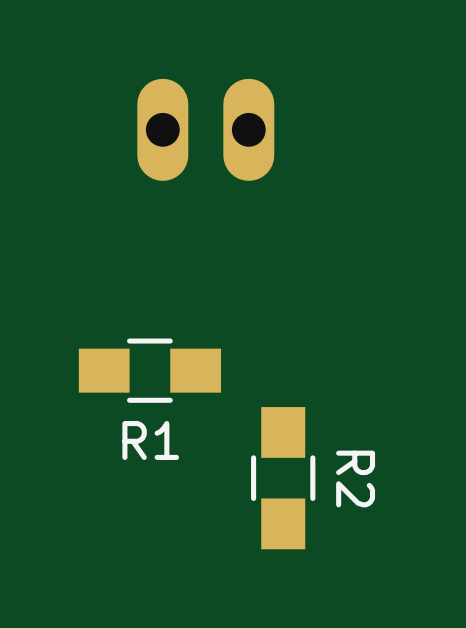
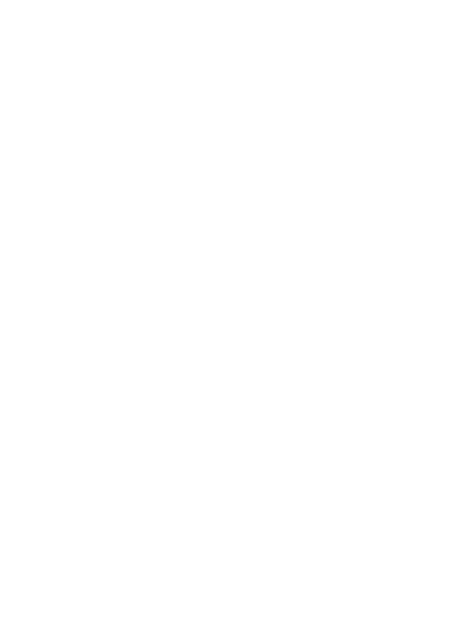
part: (205, 129) -> none
R1: (149, 370) -> none
R2: (283, 478) -> none

